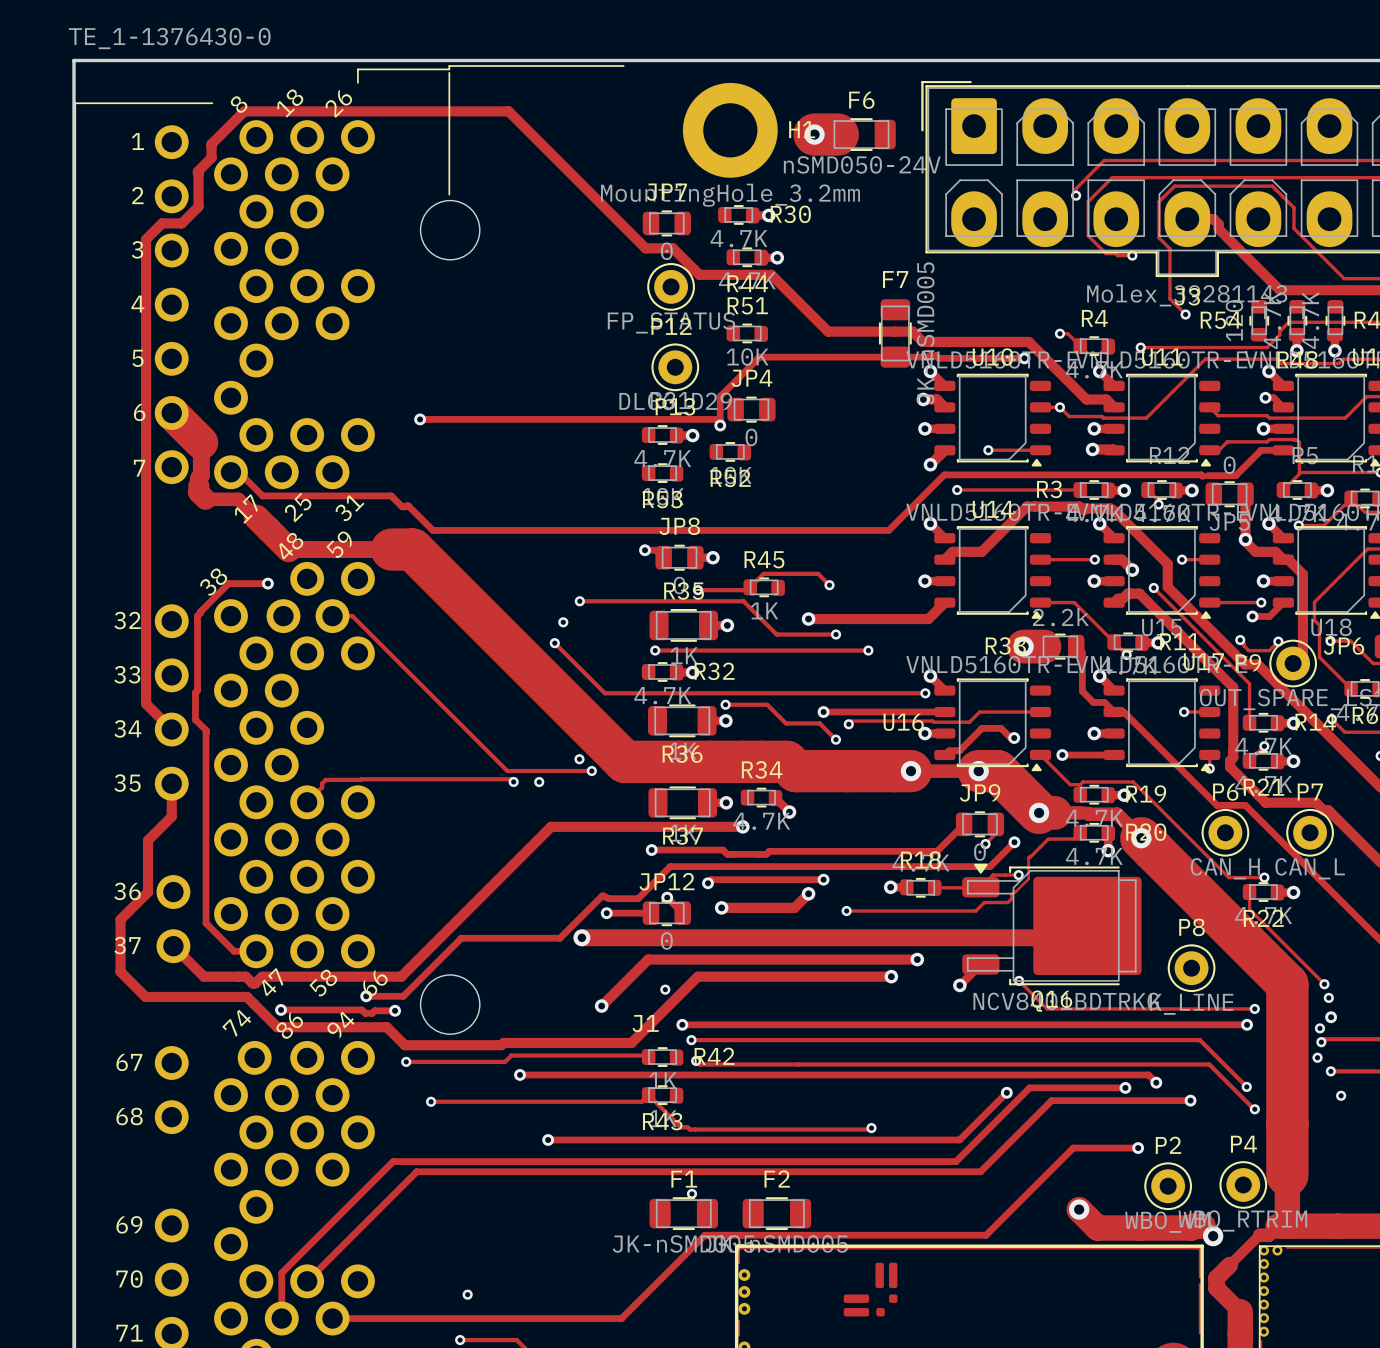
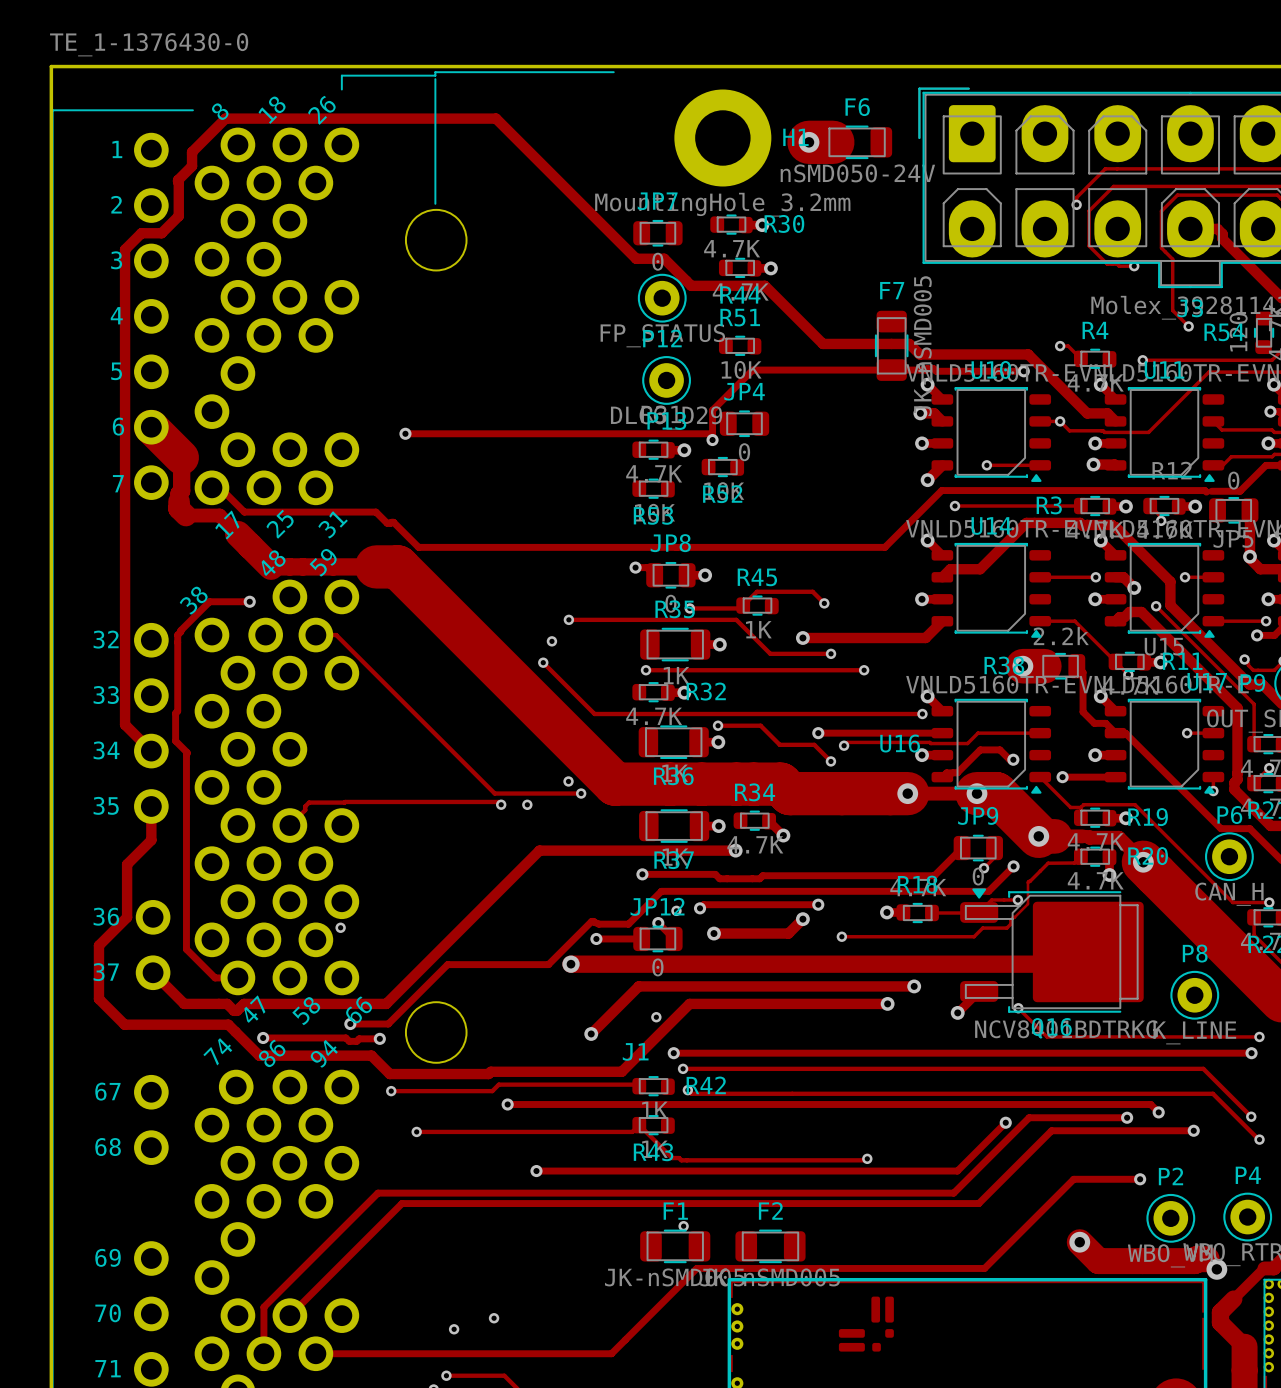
via: none -> (676, 910)
via: none -> (340, 927)
via: none -> (494, 1318)

